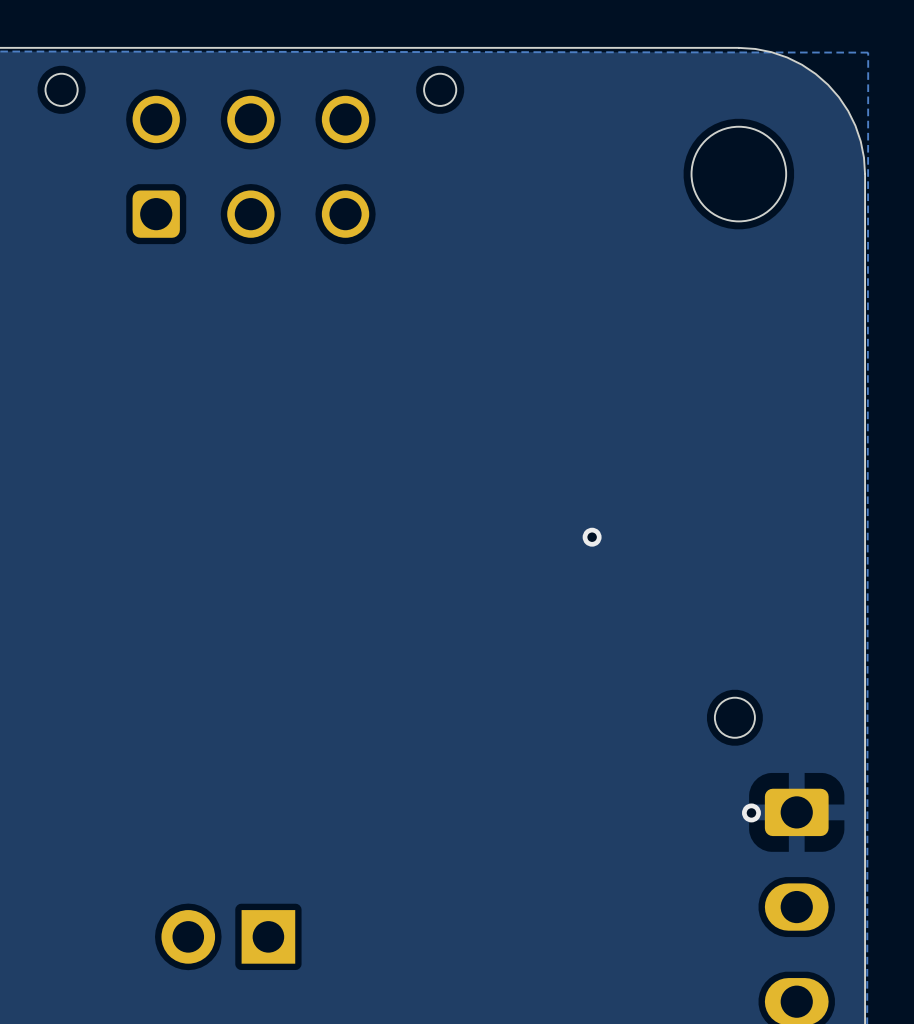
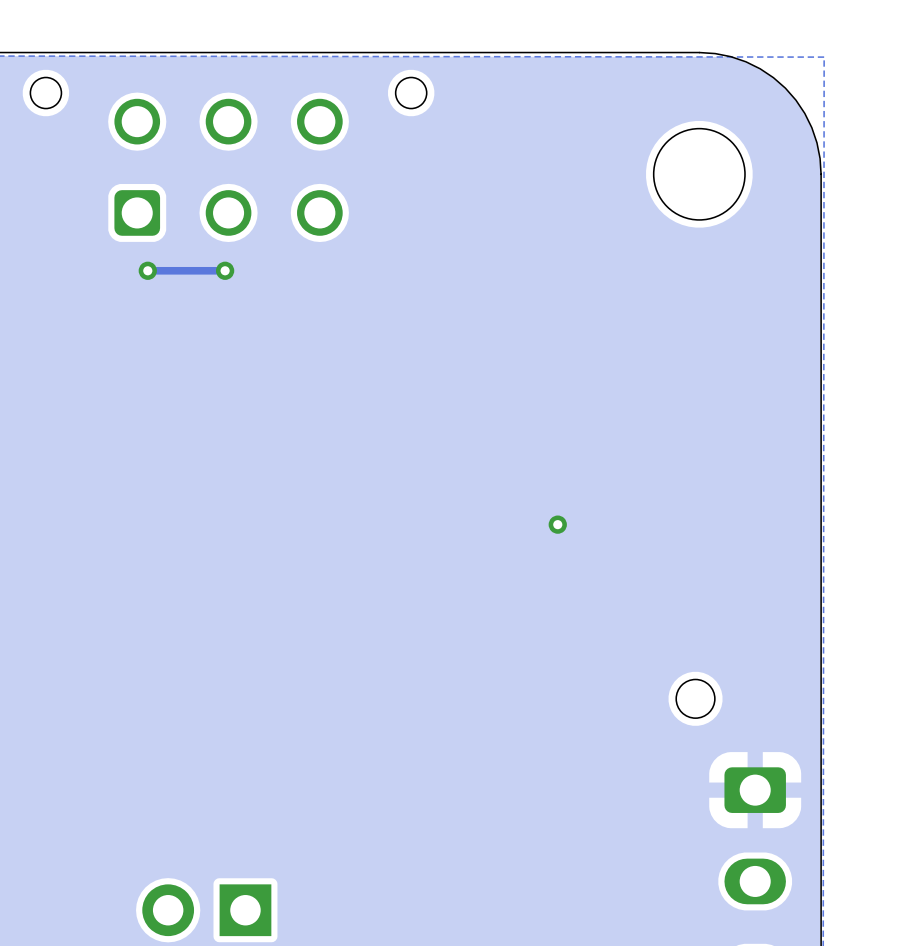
via: none -> (147, 270)
track: none -> (225, 270) (147, 270)
via: none -> (225, 270)
via: (751, 812) -> none

